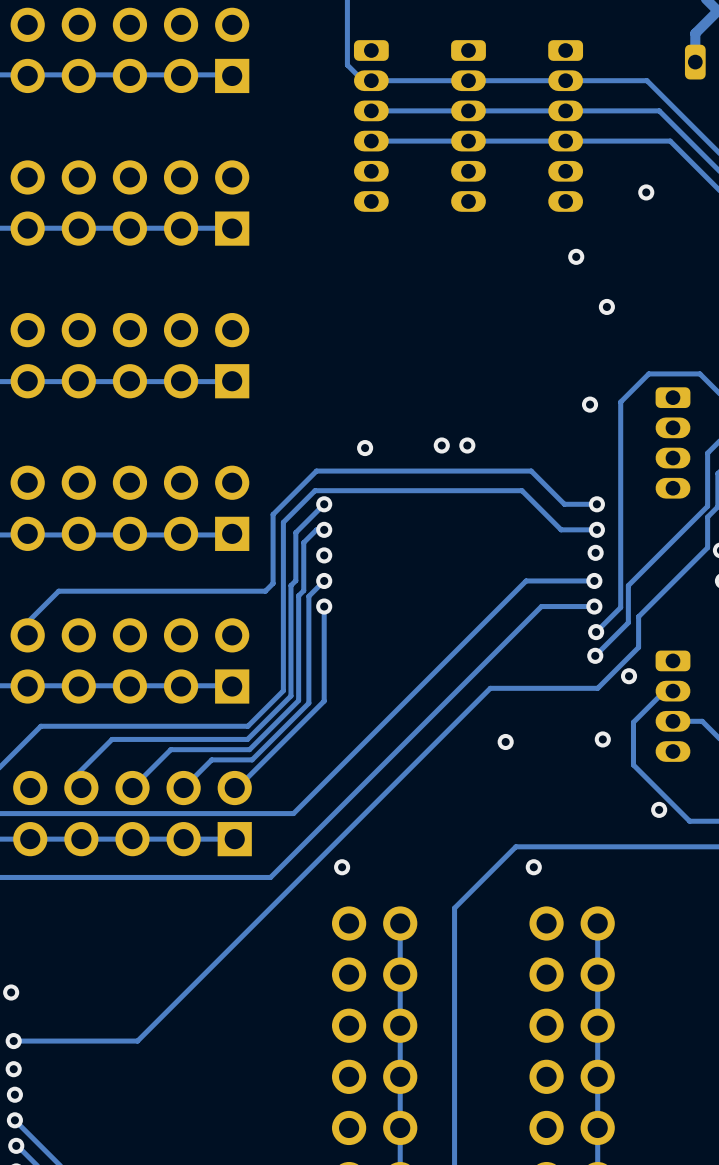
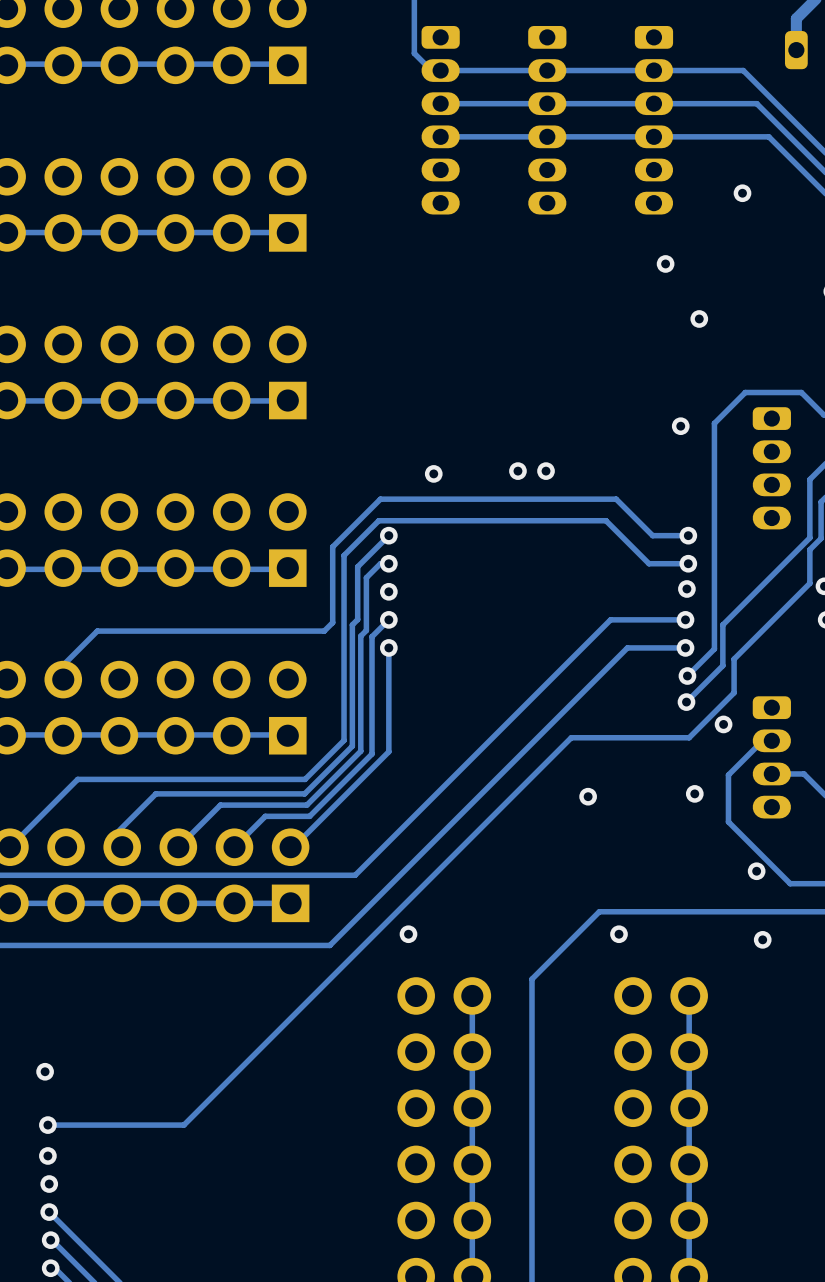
via: none -> (762, 939)

